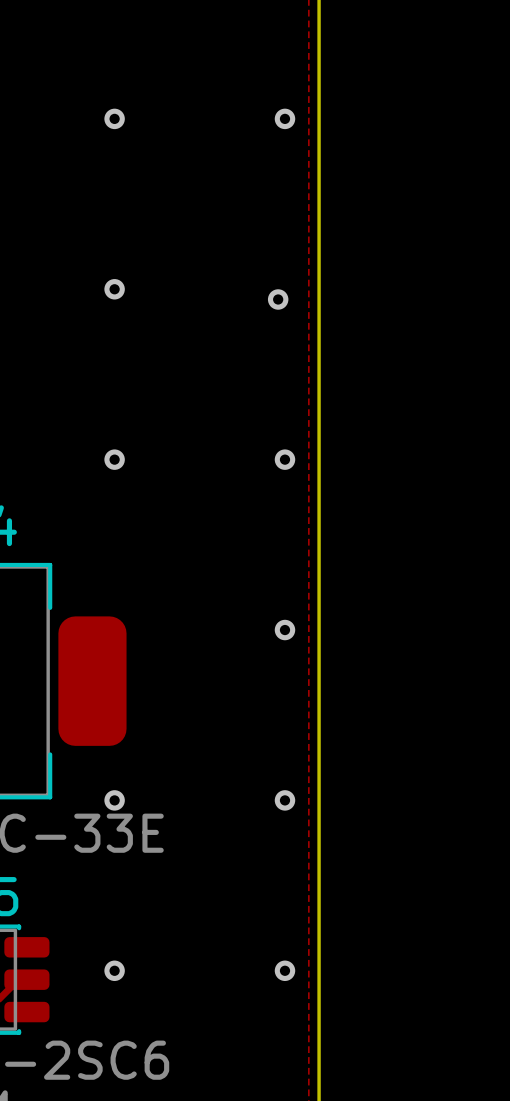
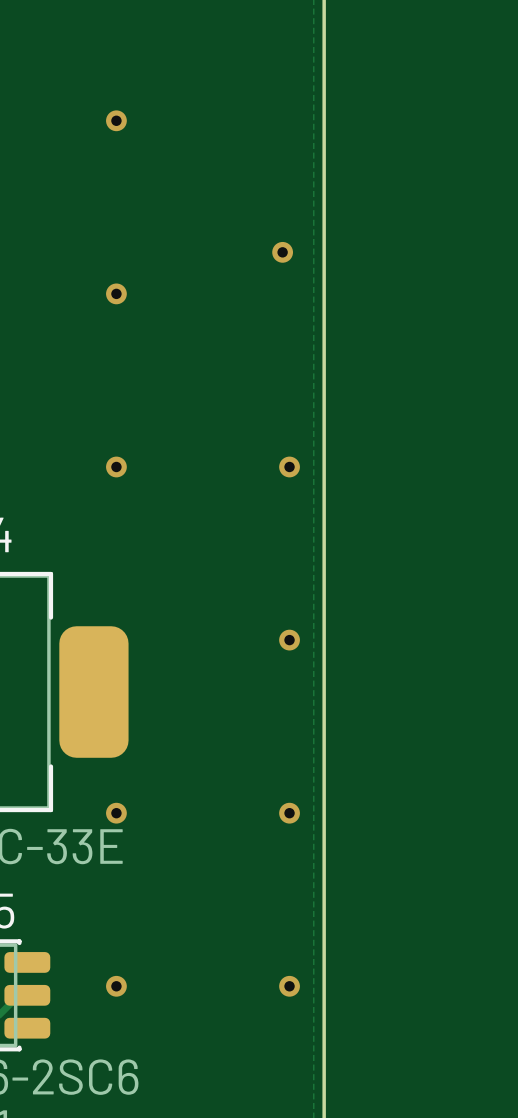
via: (284, 118) -> none
via position: (278, 299) -> (282, 252)

